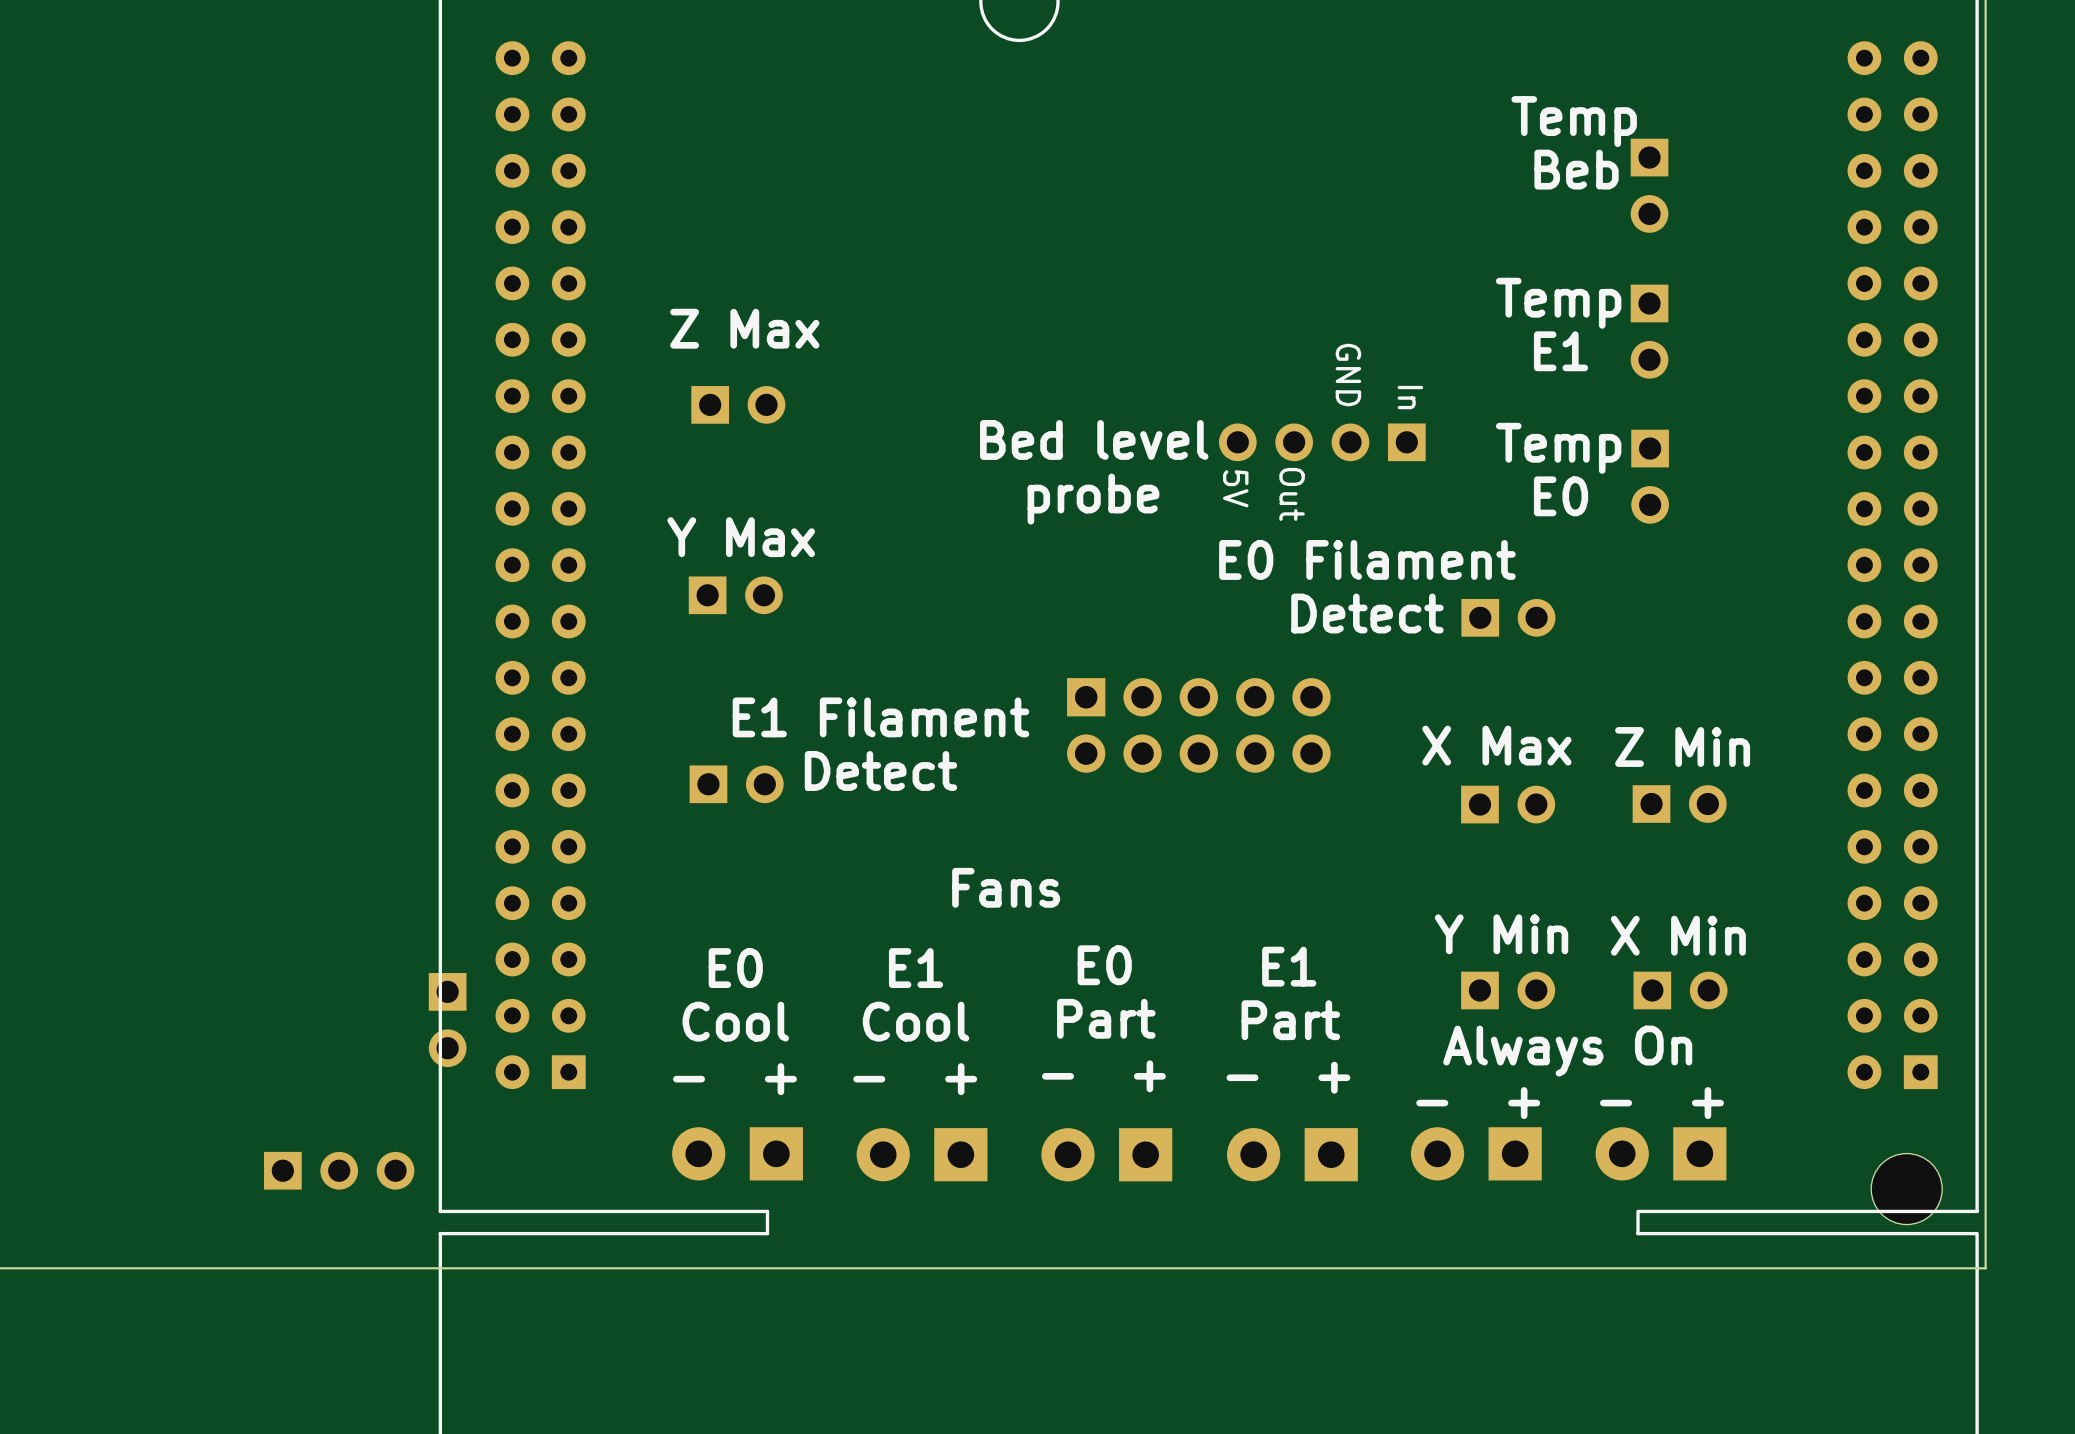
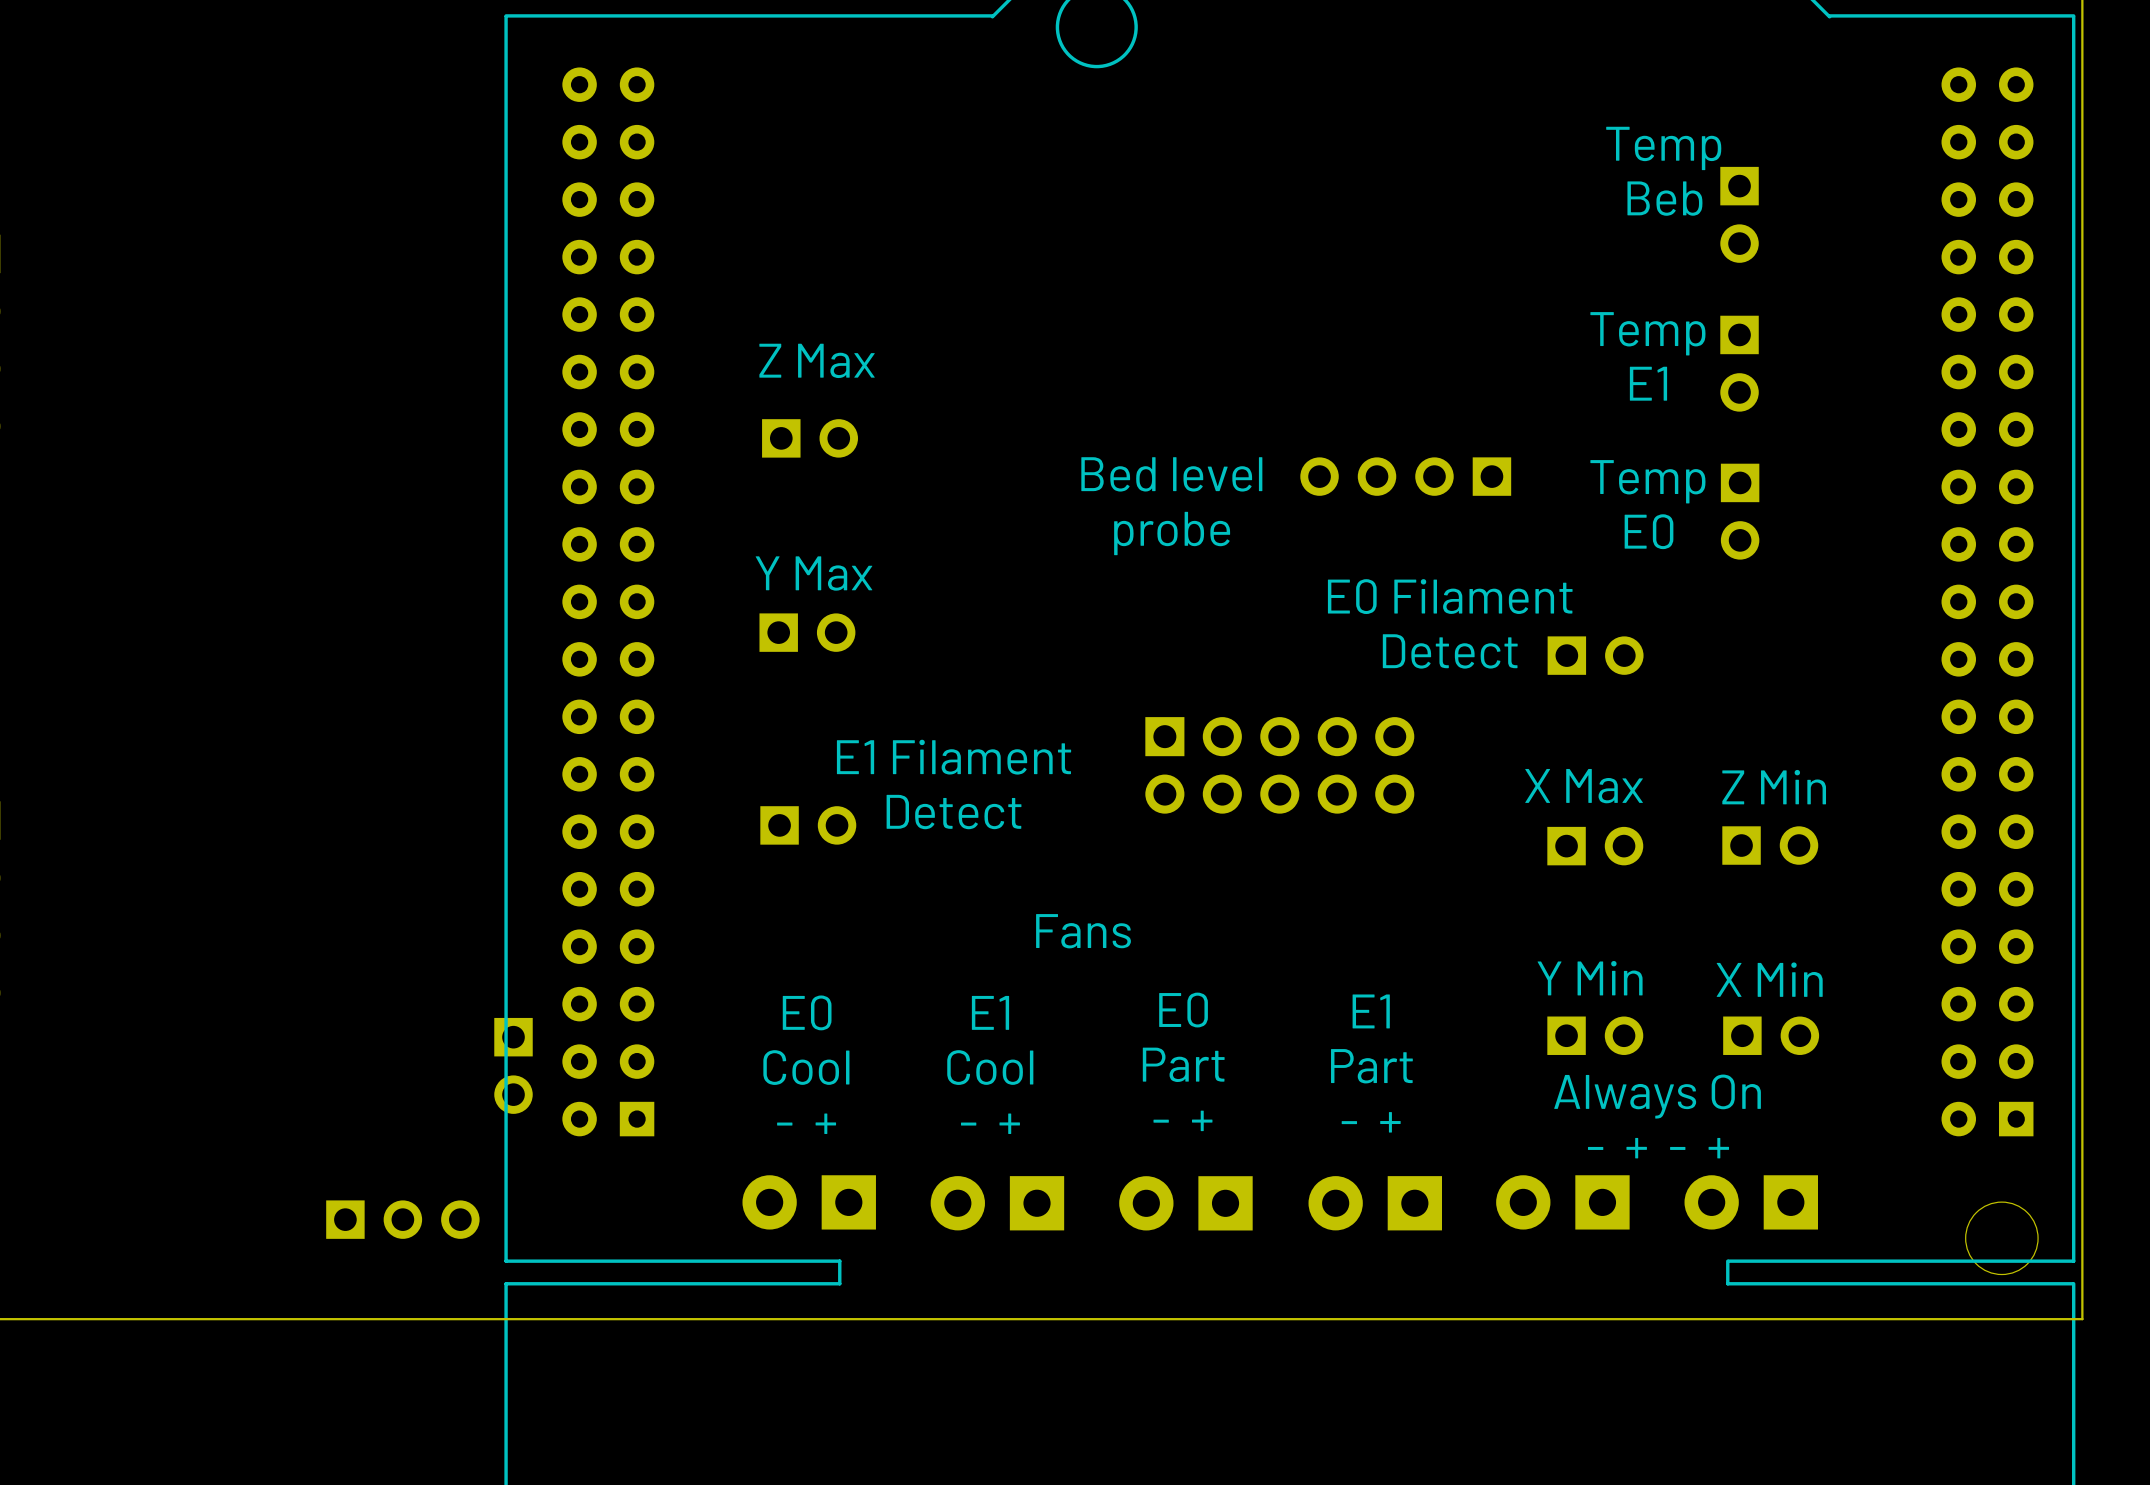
text: GND (1348, 375) -> none
text: In (1410, 397) -> none
text: 5V (1235, 488) -> none
text: Out (1292, 494) -> none

